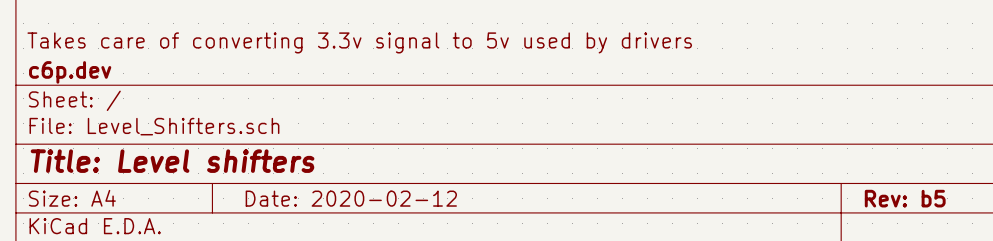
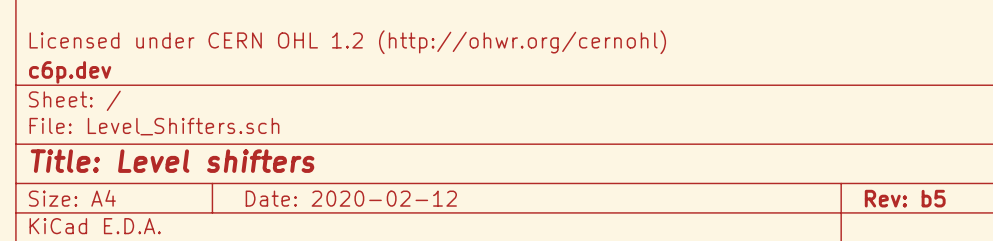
title block: Takes care of converting 3.3v signal to 5v used by drivers (359, 42) -> Licensed under CERN OHL 1.2 (http://ohwr.org/cernohl) (347, 42)

